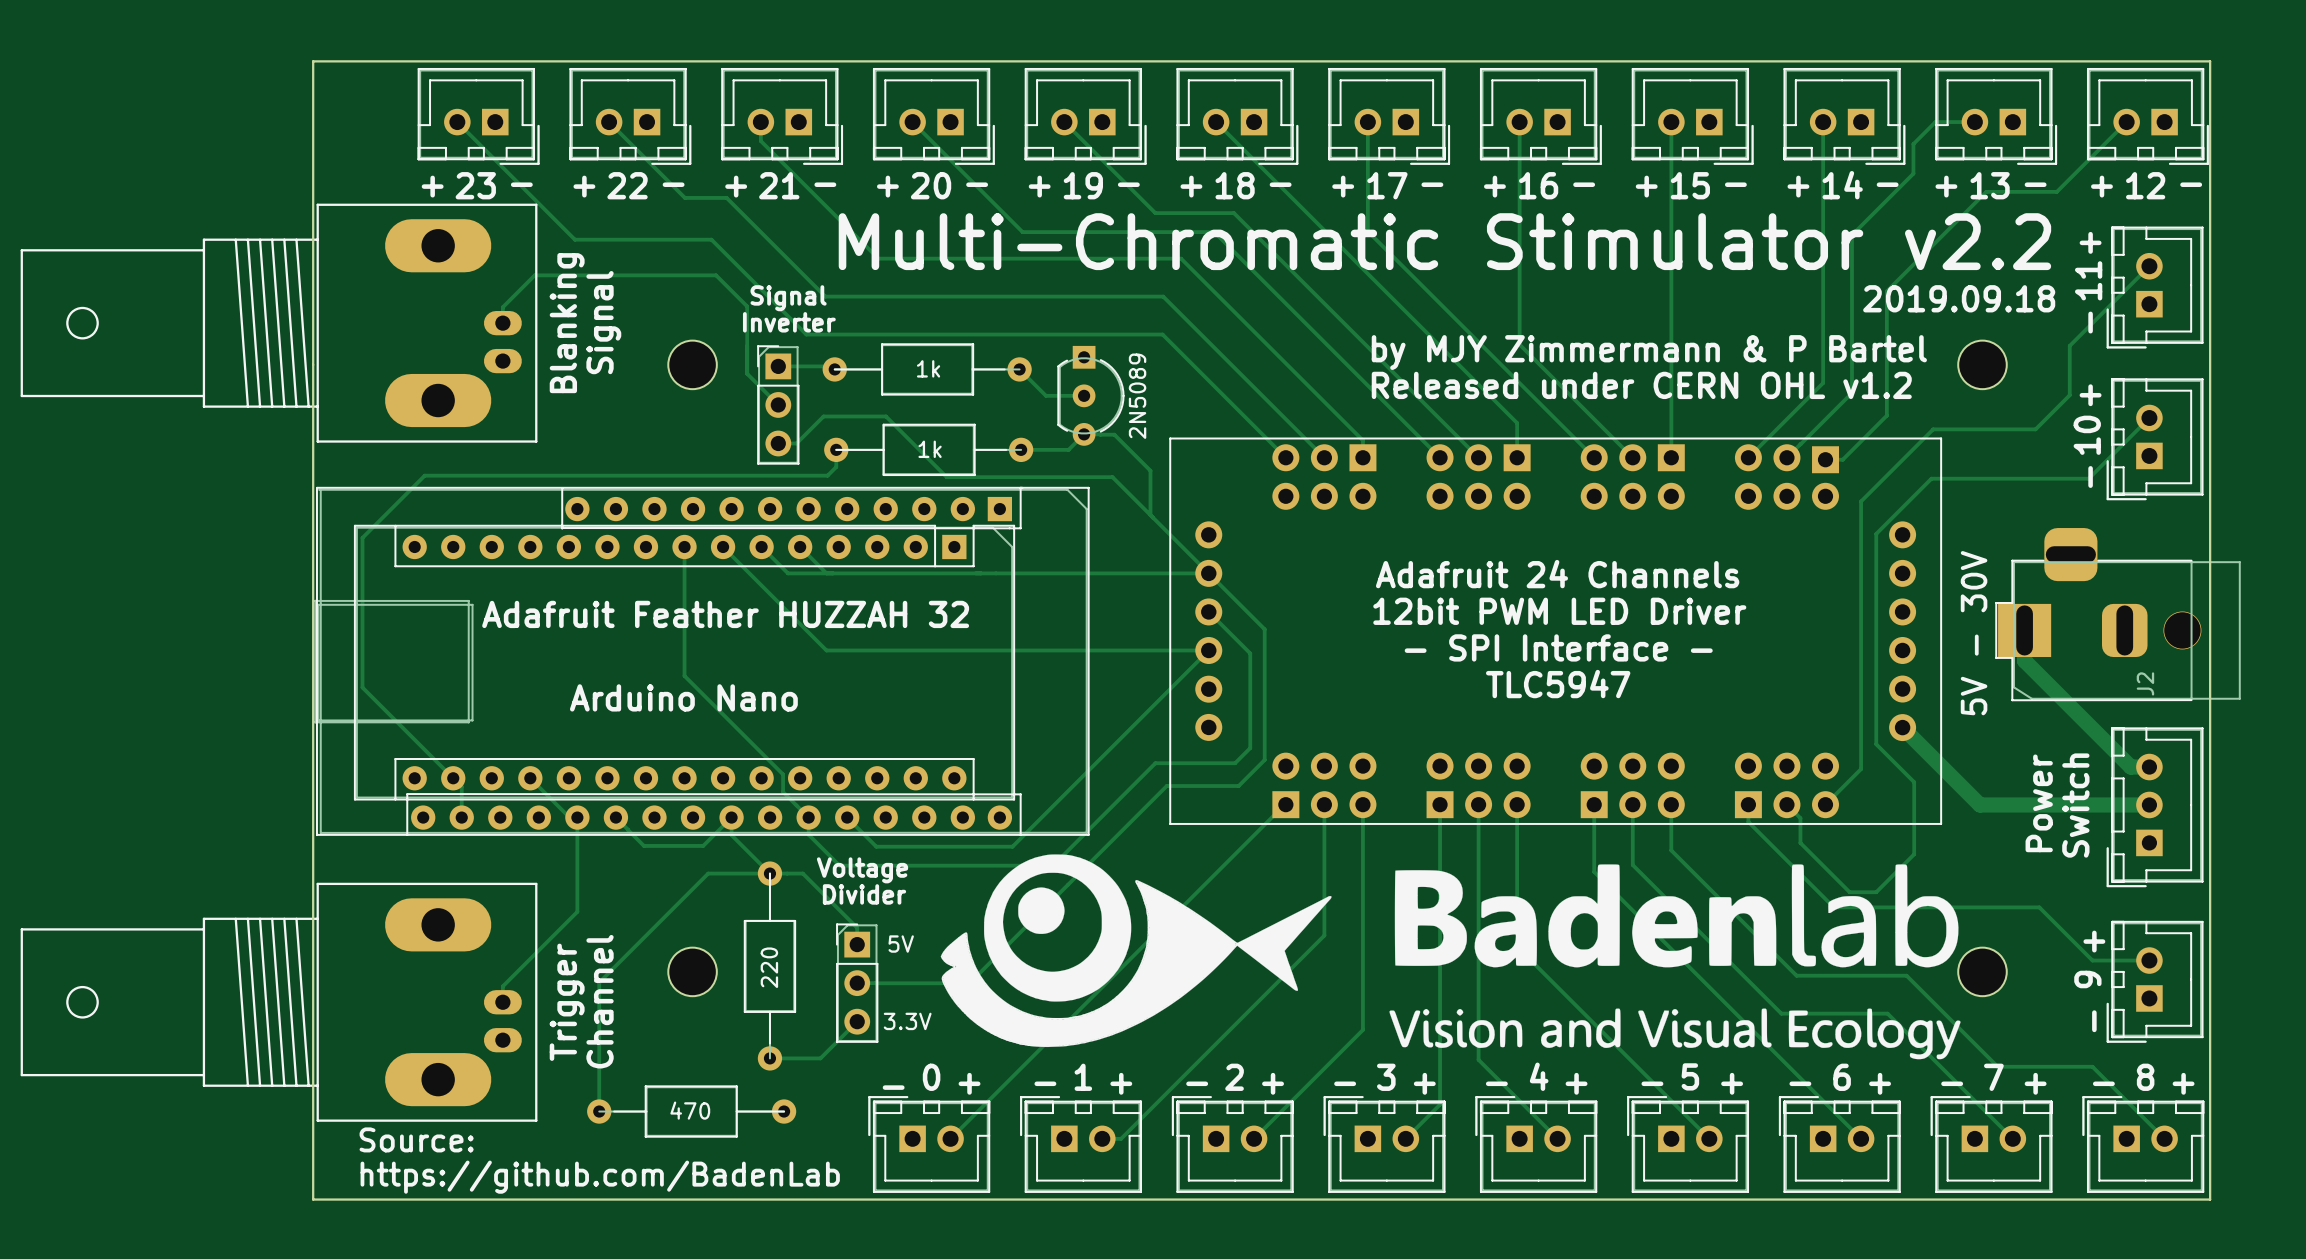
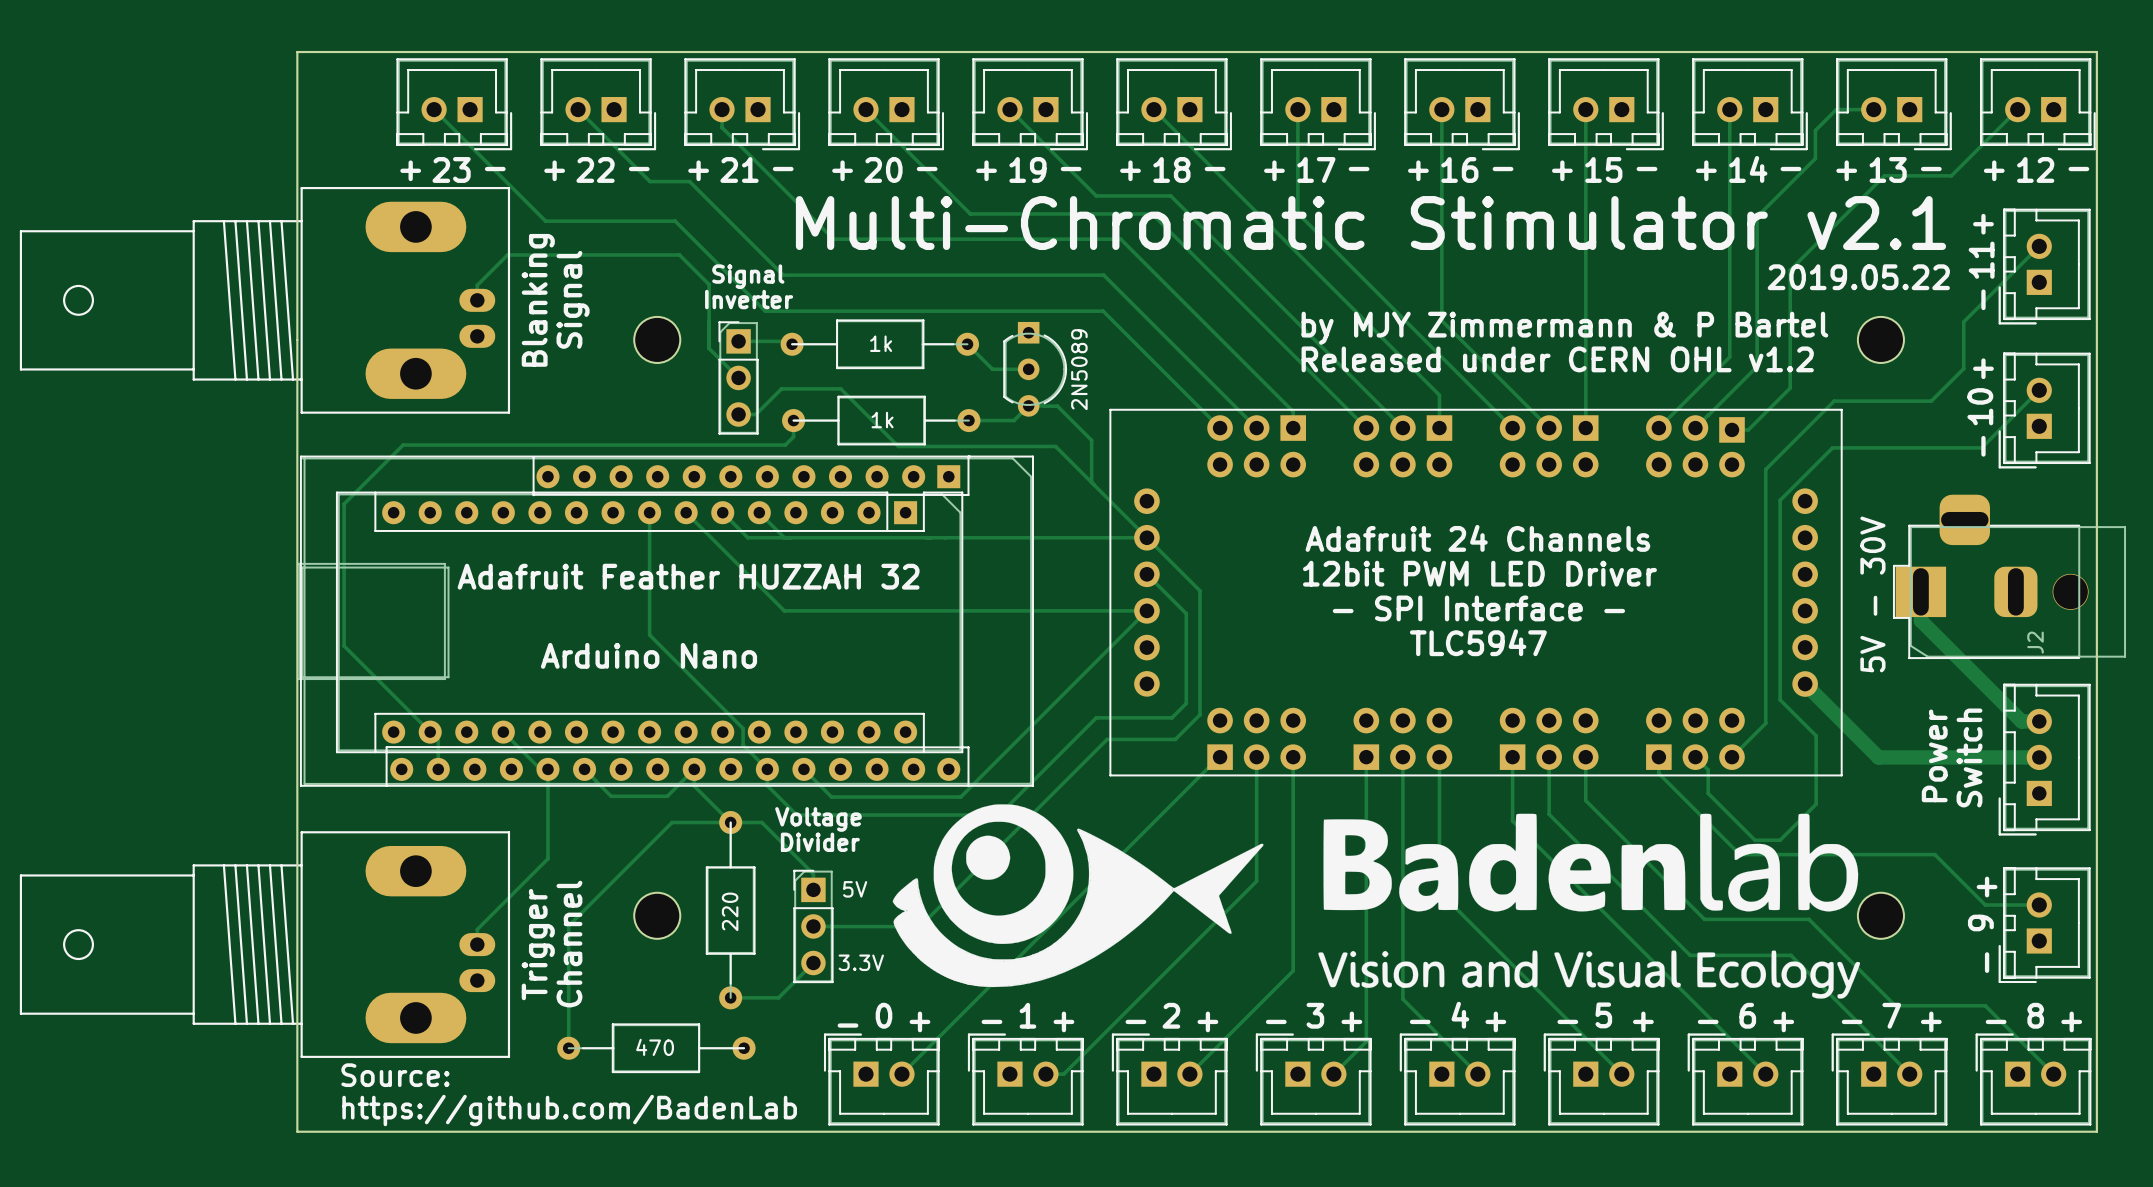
text: Multi-Chromatic Stimulator v2.2 (1444, 241) -> Multi-Chromatic Stimulator v2.1 (1370, 223)
text: 2019.09.18 (1959, 298) -> 2019.05.22 (1858, 277)

